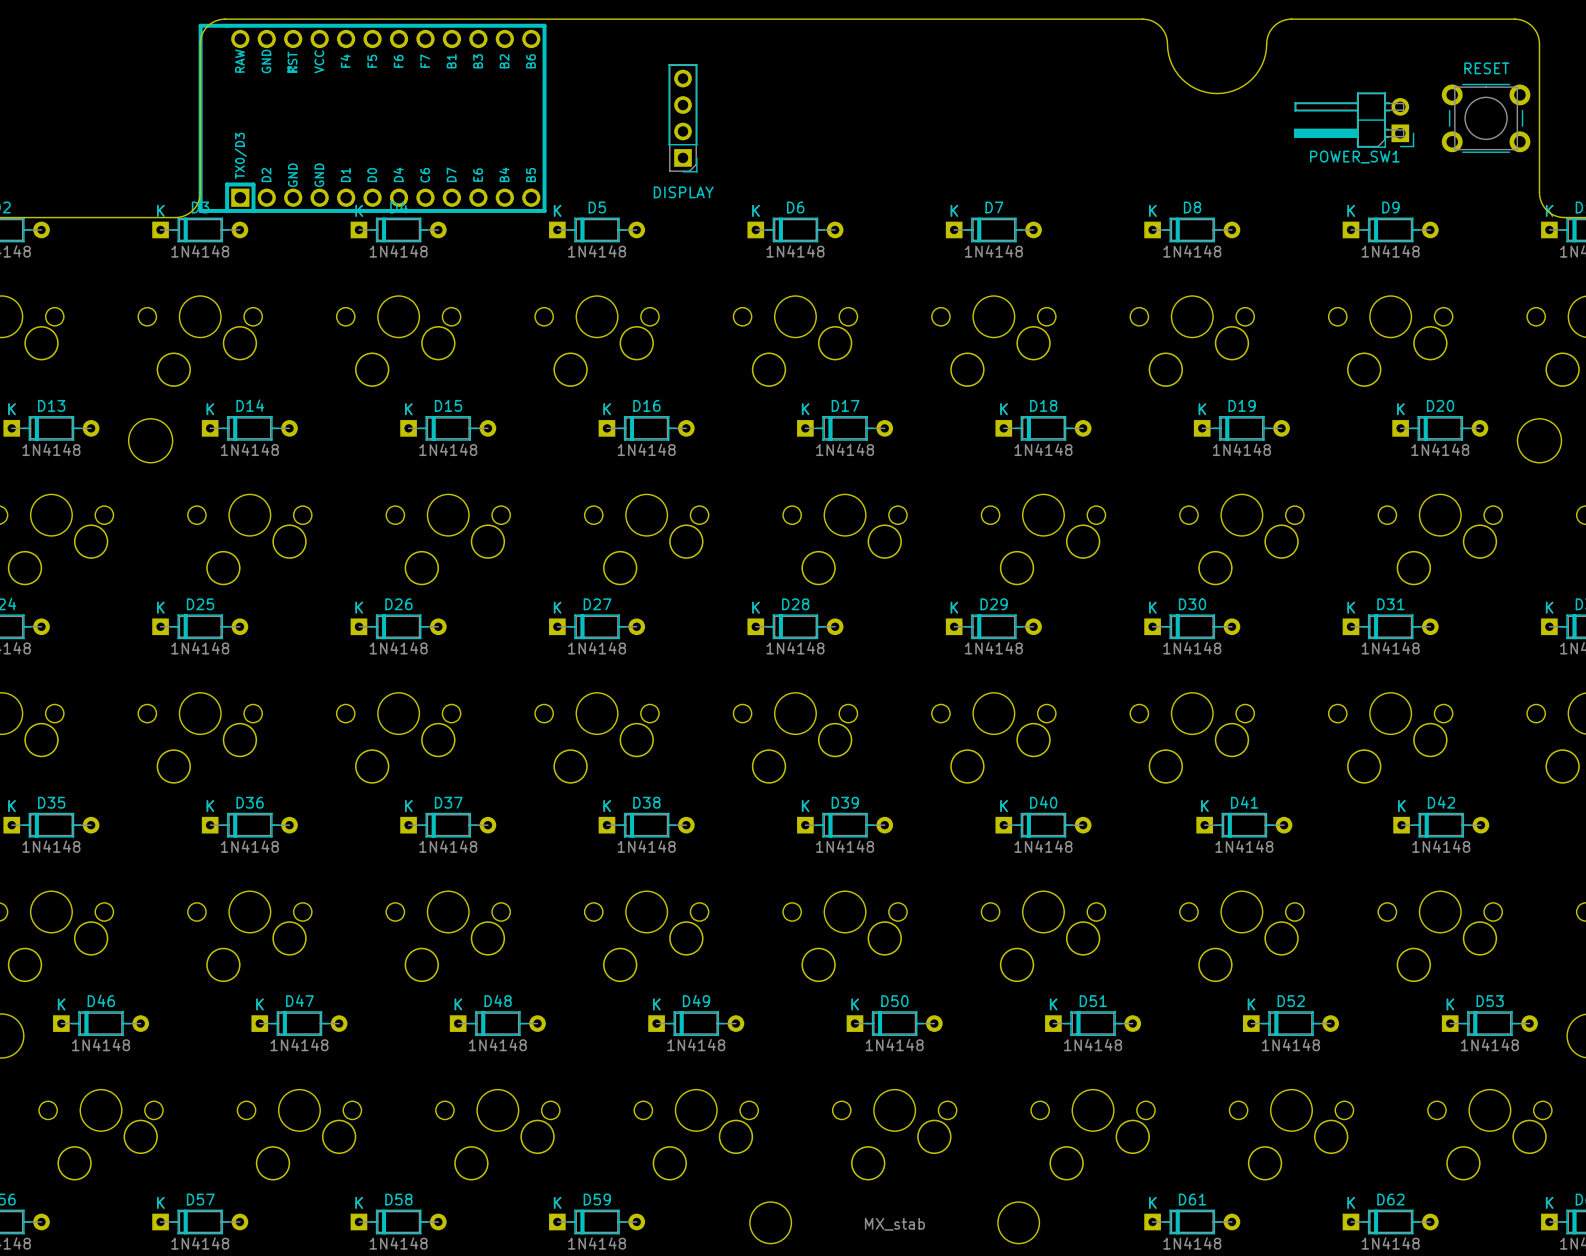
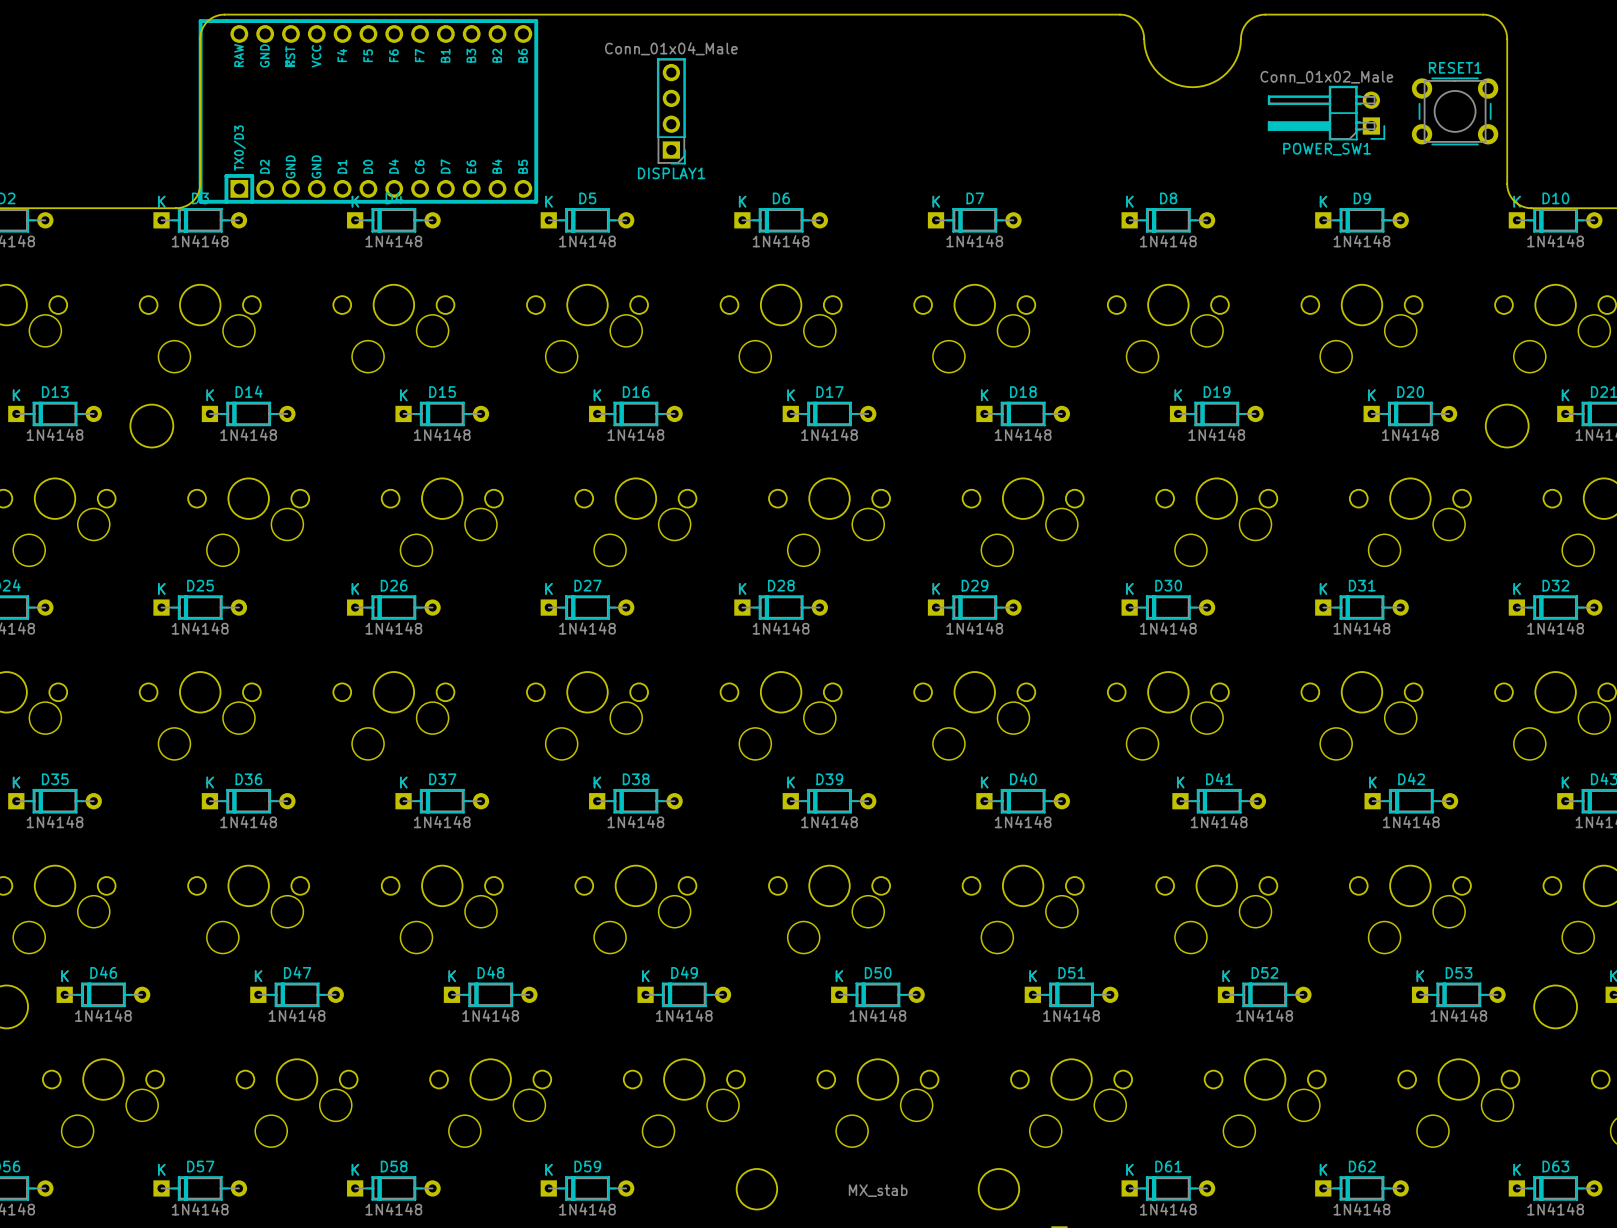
DISPLAY value: none -> Conn_01x04_Male (671, 48)
RESET name: RESET (1486, 68) -> RESET1 (1455, 67)
POWER_SW1 value: none -> Conn_01x02_Male (1326, 77)
DISPLAY name: DISPLAY (683, 192) -> DISPLAY1 (671, 173)

